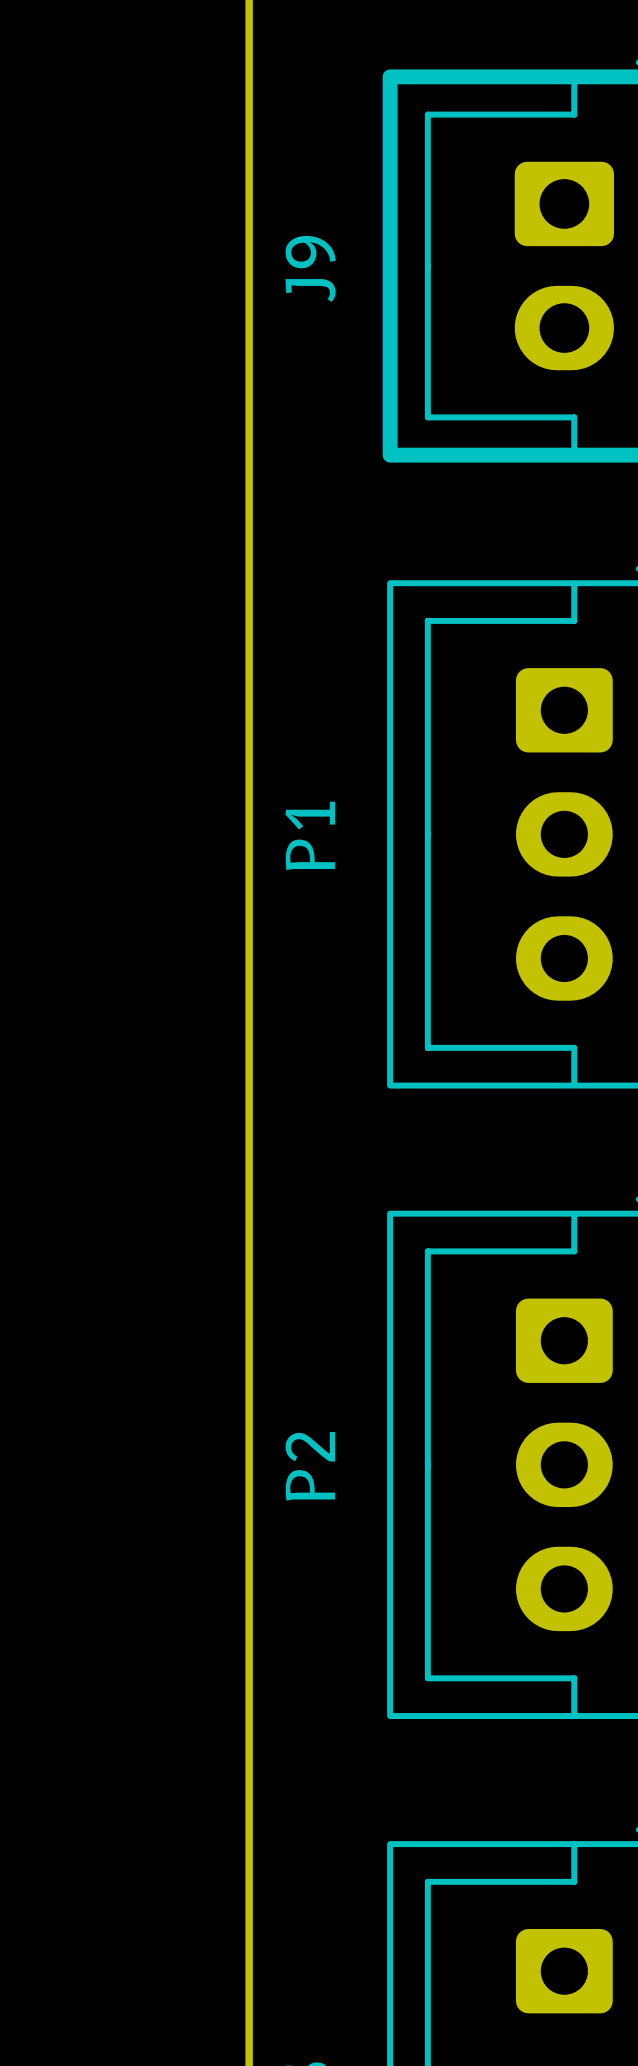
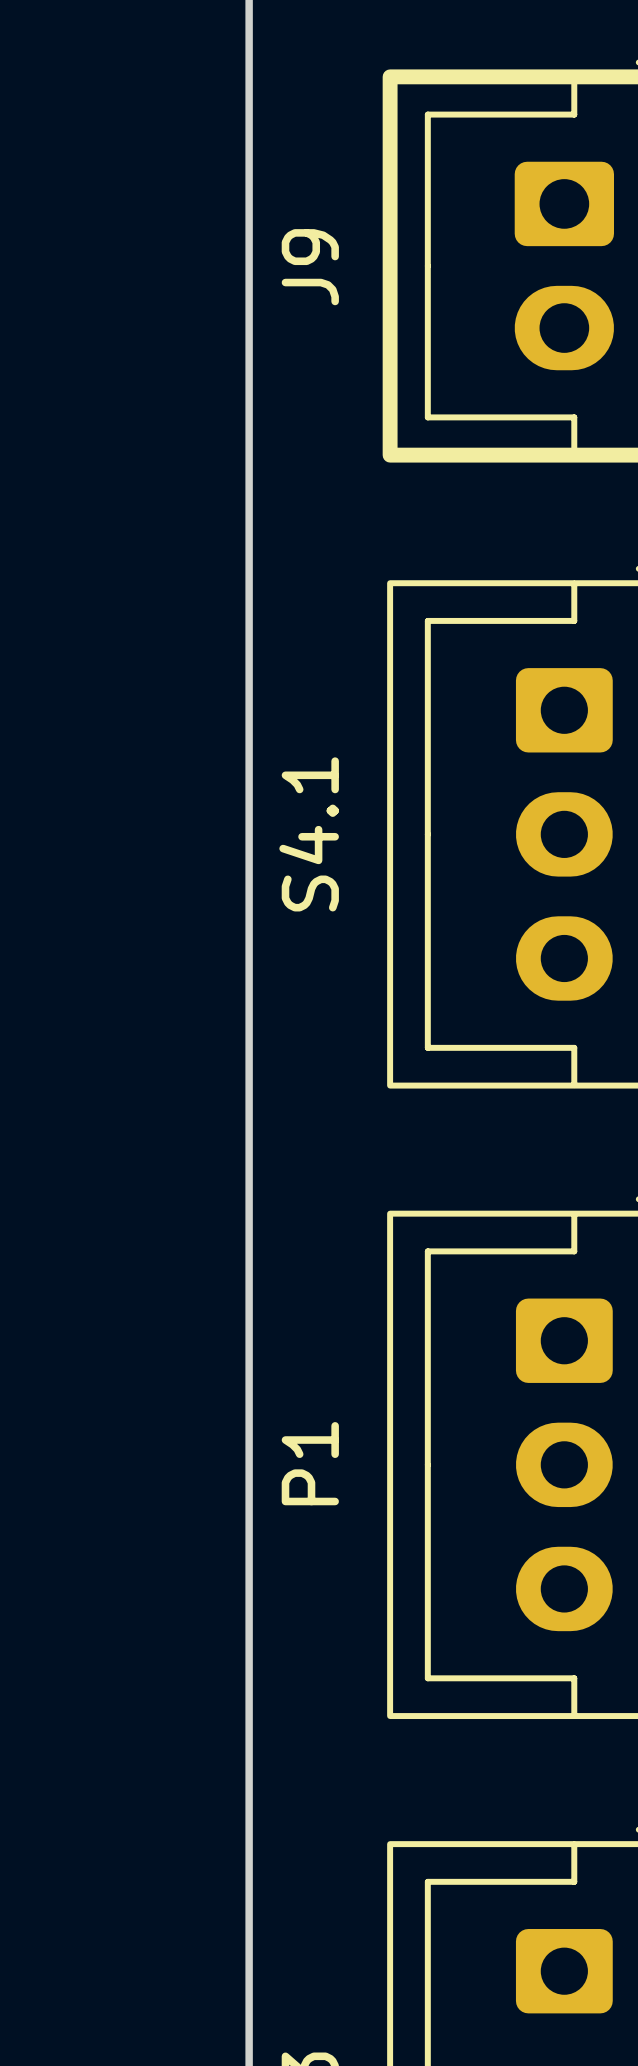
P1 name: P1 (310, 835) -> S4.1 (309, 834)
P2 name: P2 (310, 1466) -> P1 (310, 1463)

